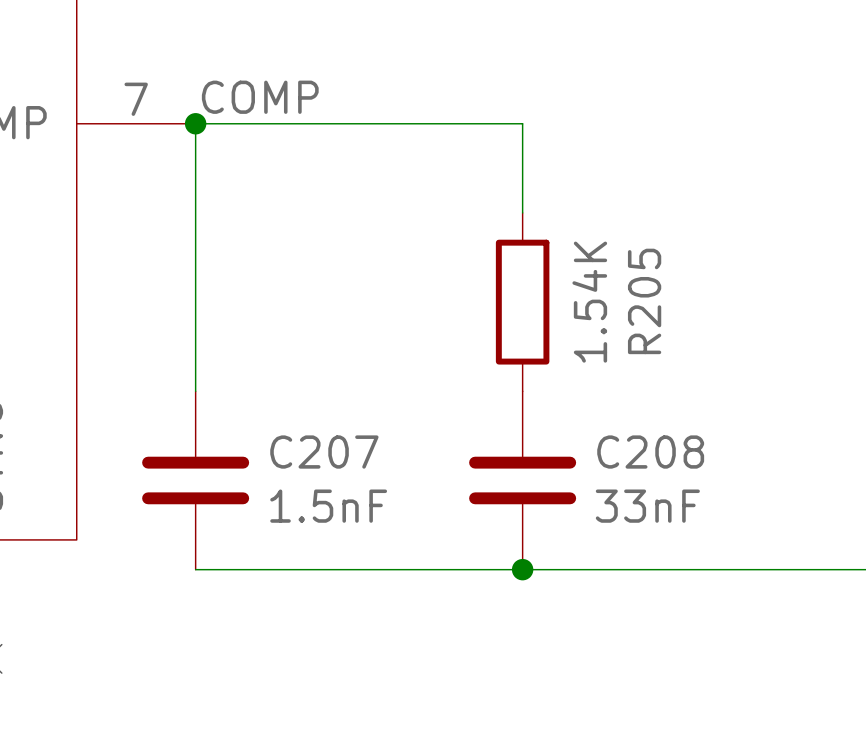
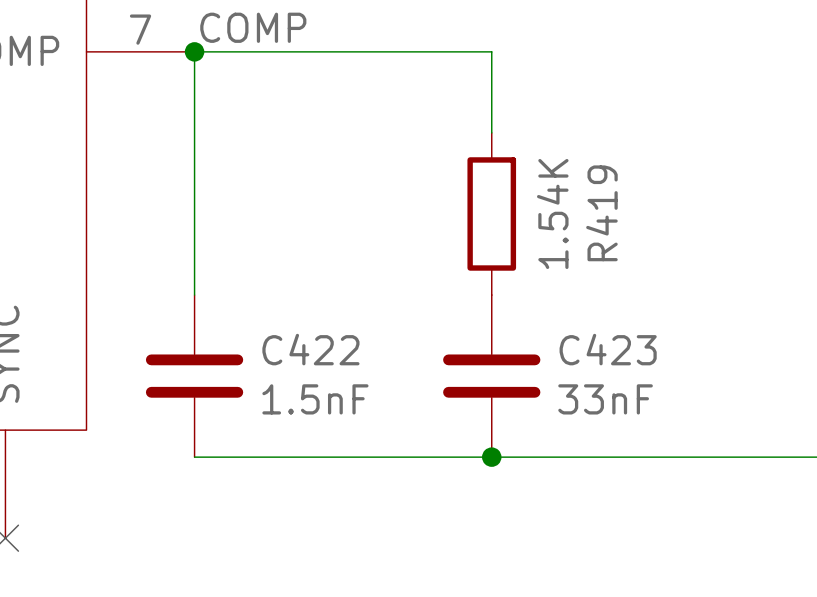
R205 name: R205 (644, 301) -> R419 (601, 213)
C207 name: C207 (324, 452) -> C422 (310, 349)
C208 name: C208 (650, 452) -> C423 (608, 349)

